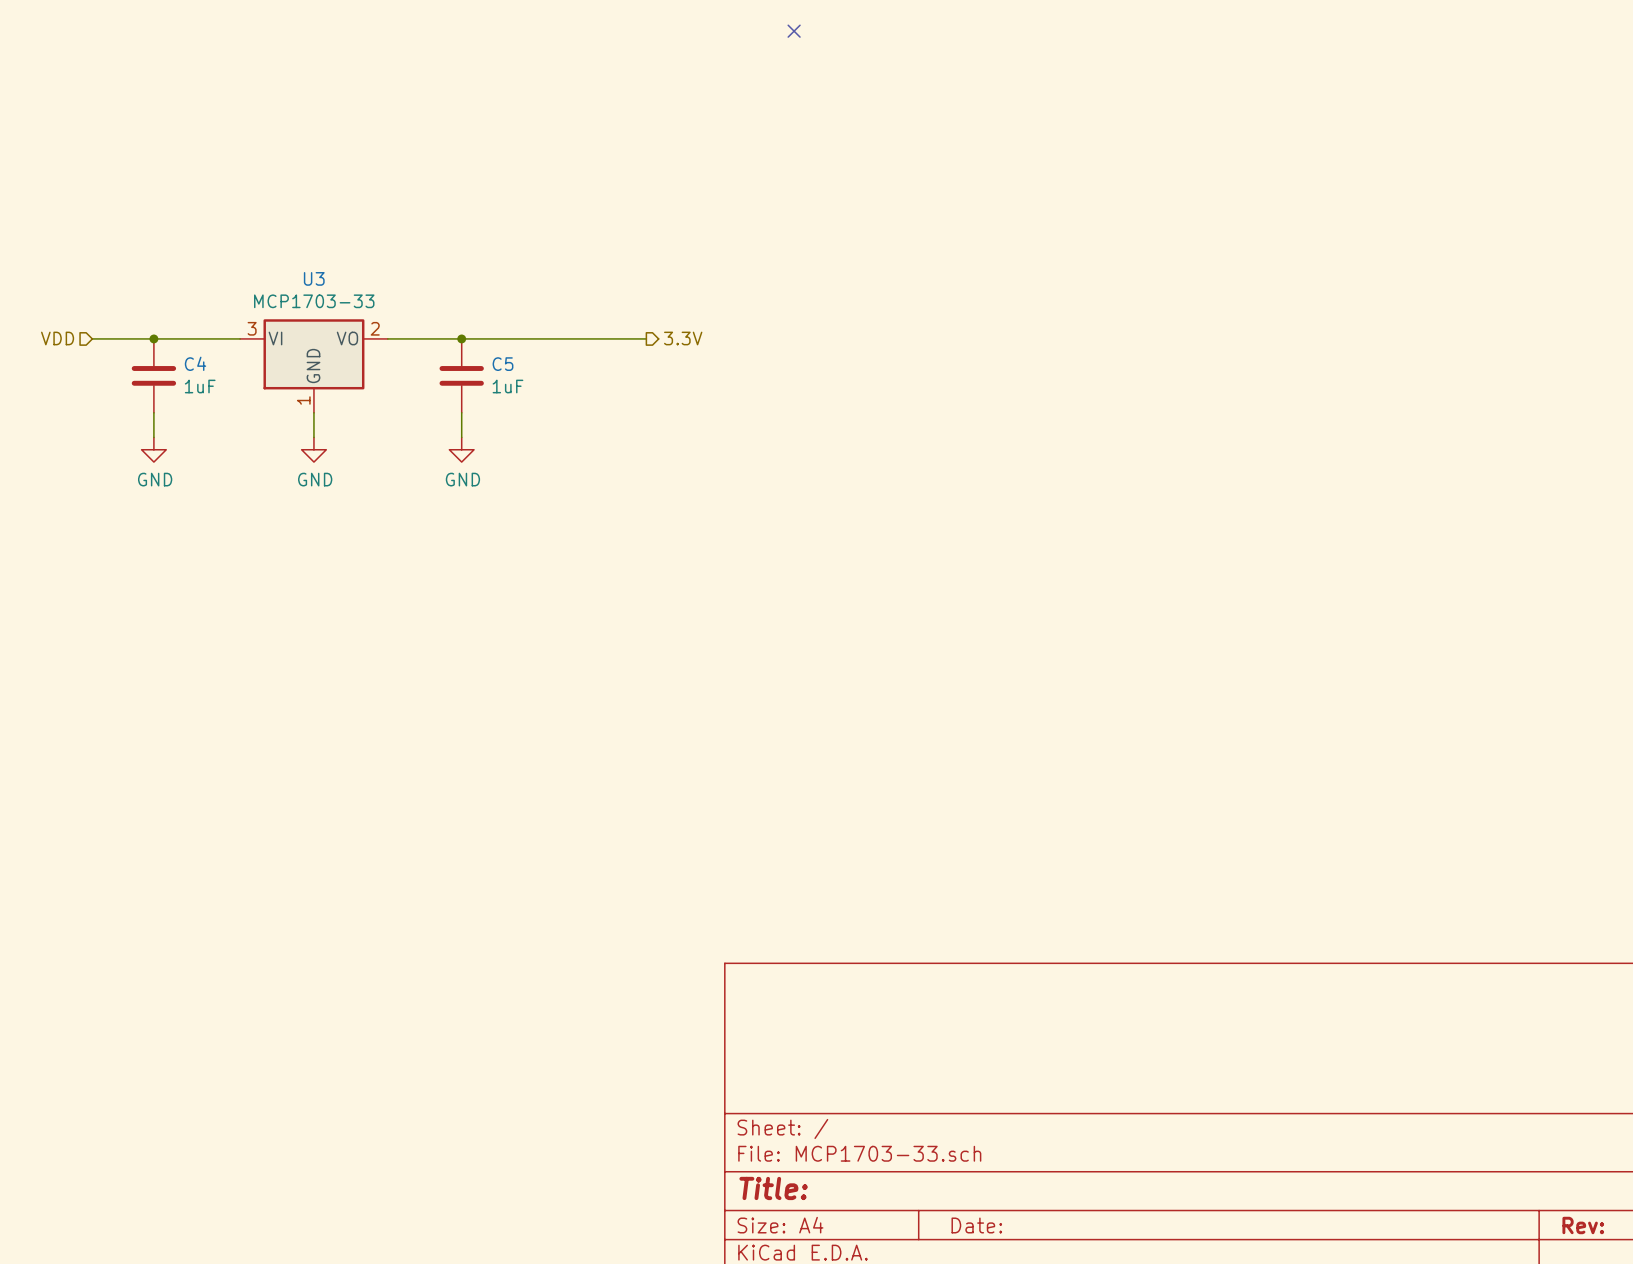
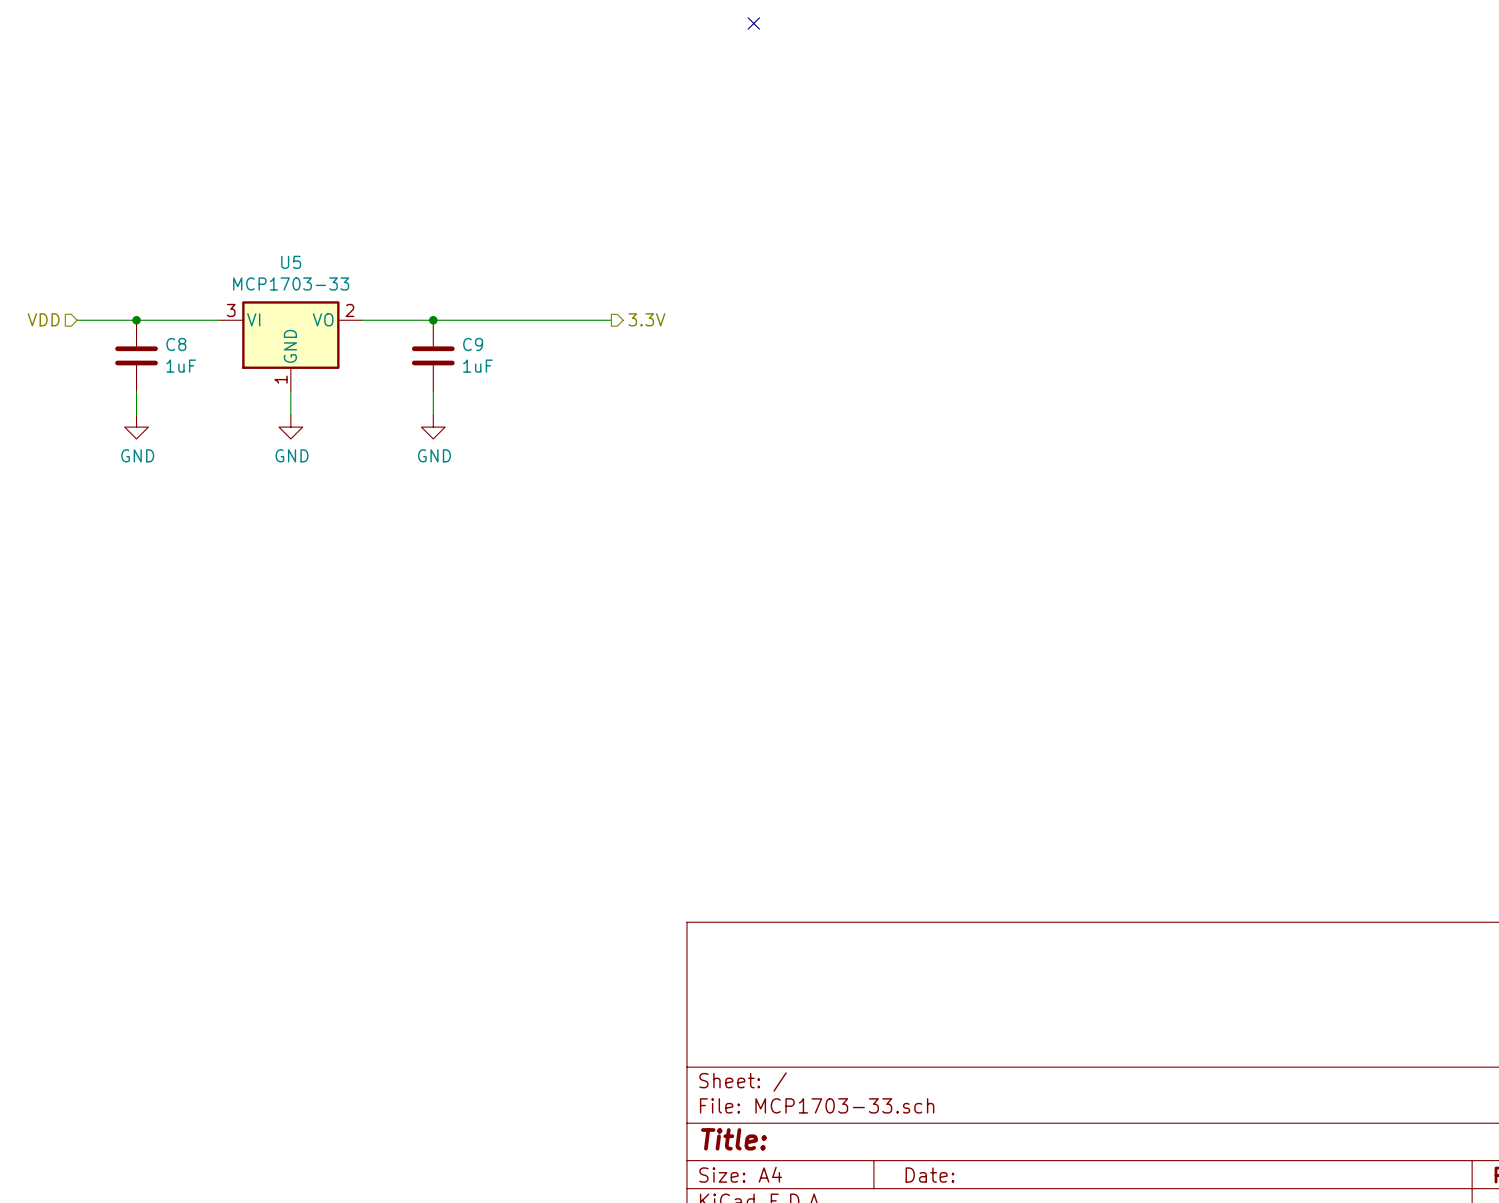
U3 name: U3 (314, 278) -> U5 (291, 262)
C4 name: C4 (195, 363) -> C8 (176, 344)
C5 name: C5 (503, 364) -> C9 (473, 344)

